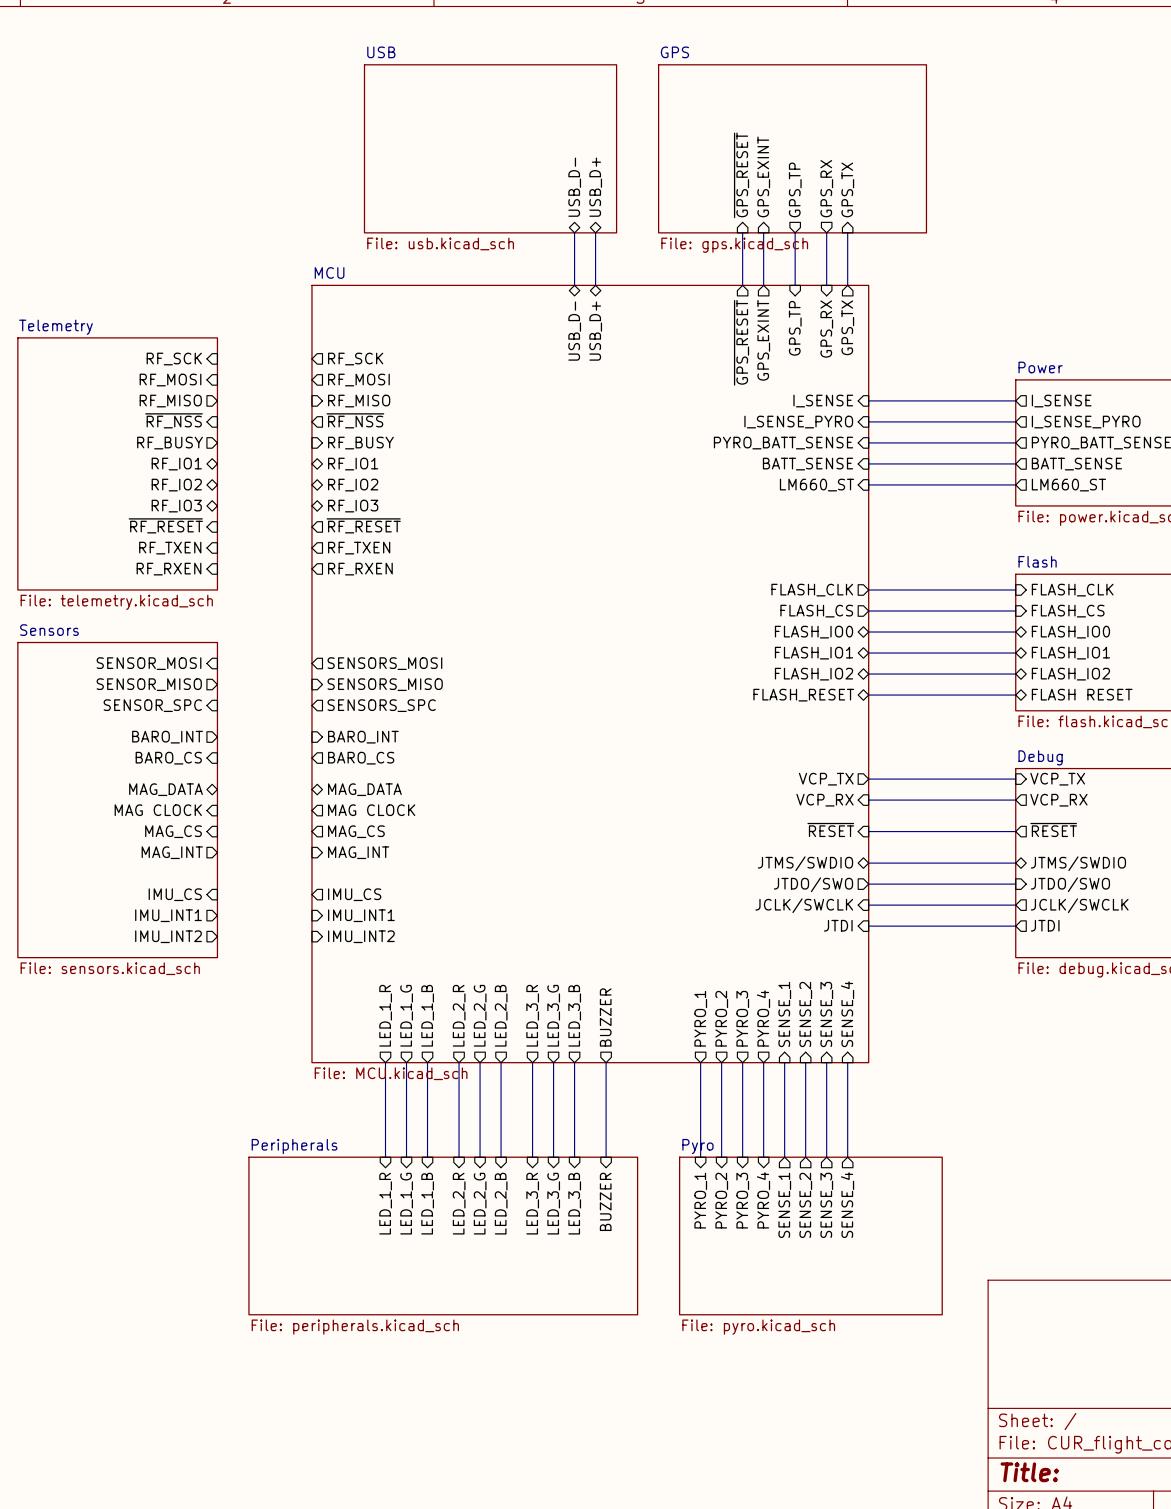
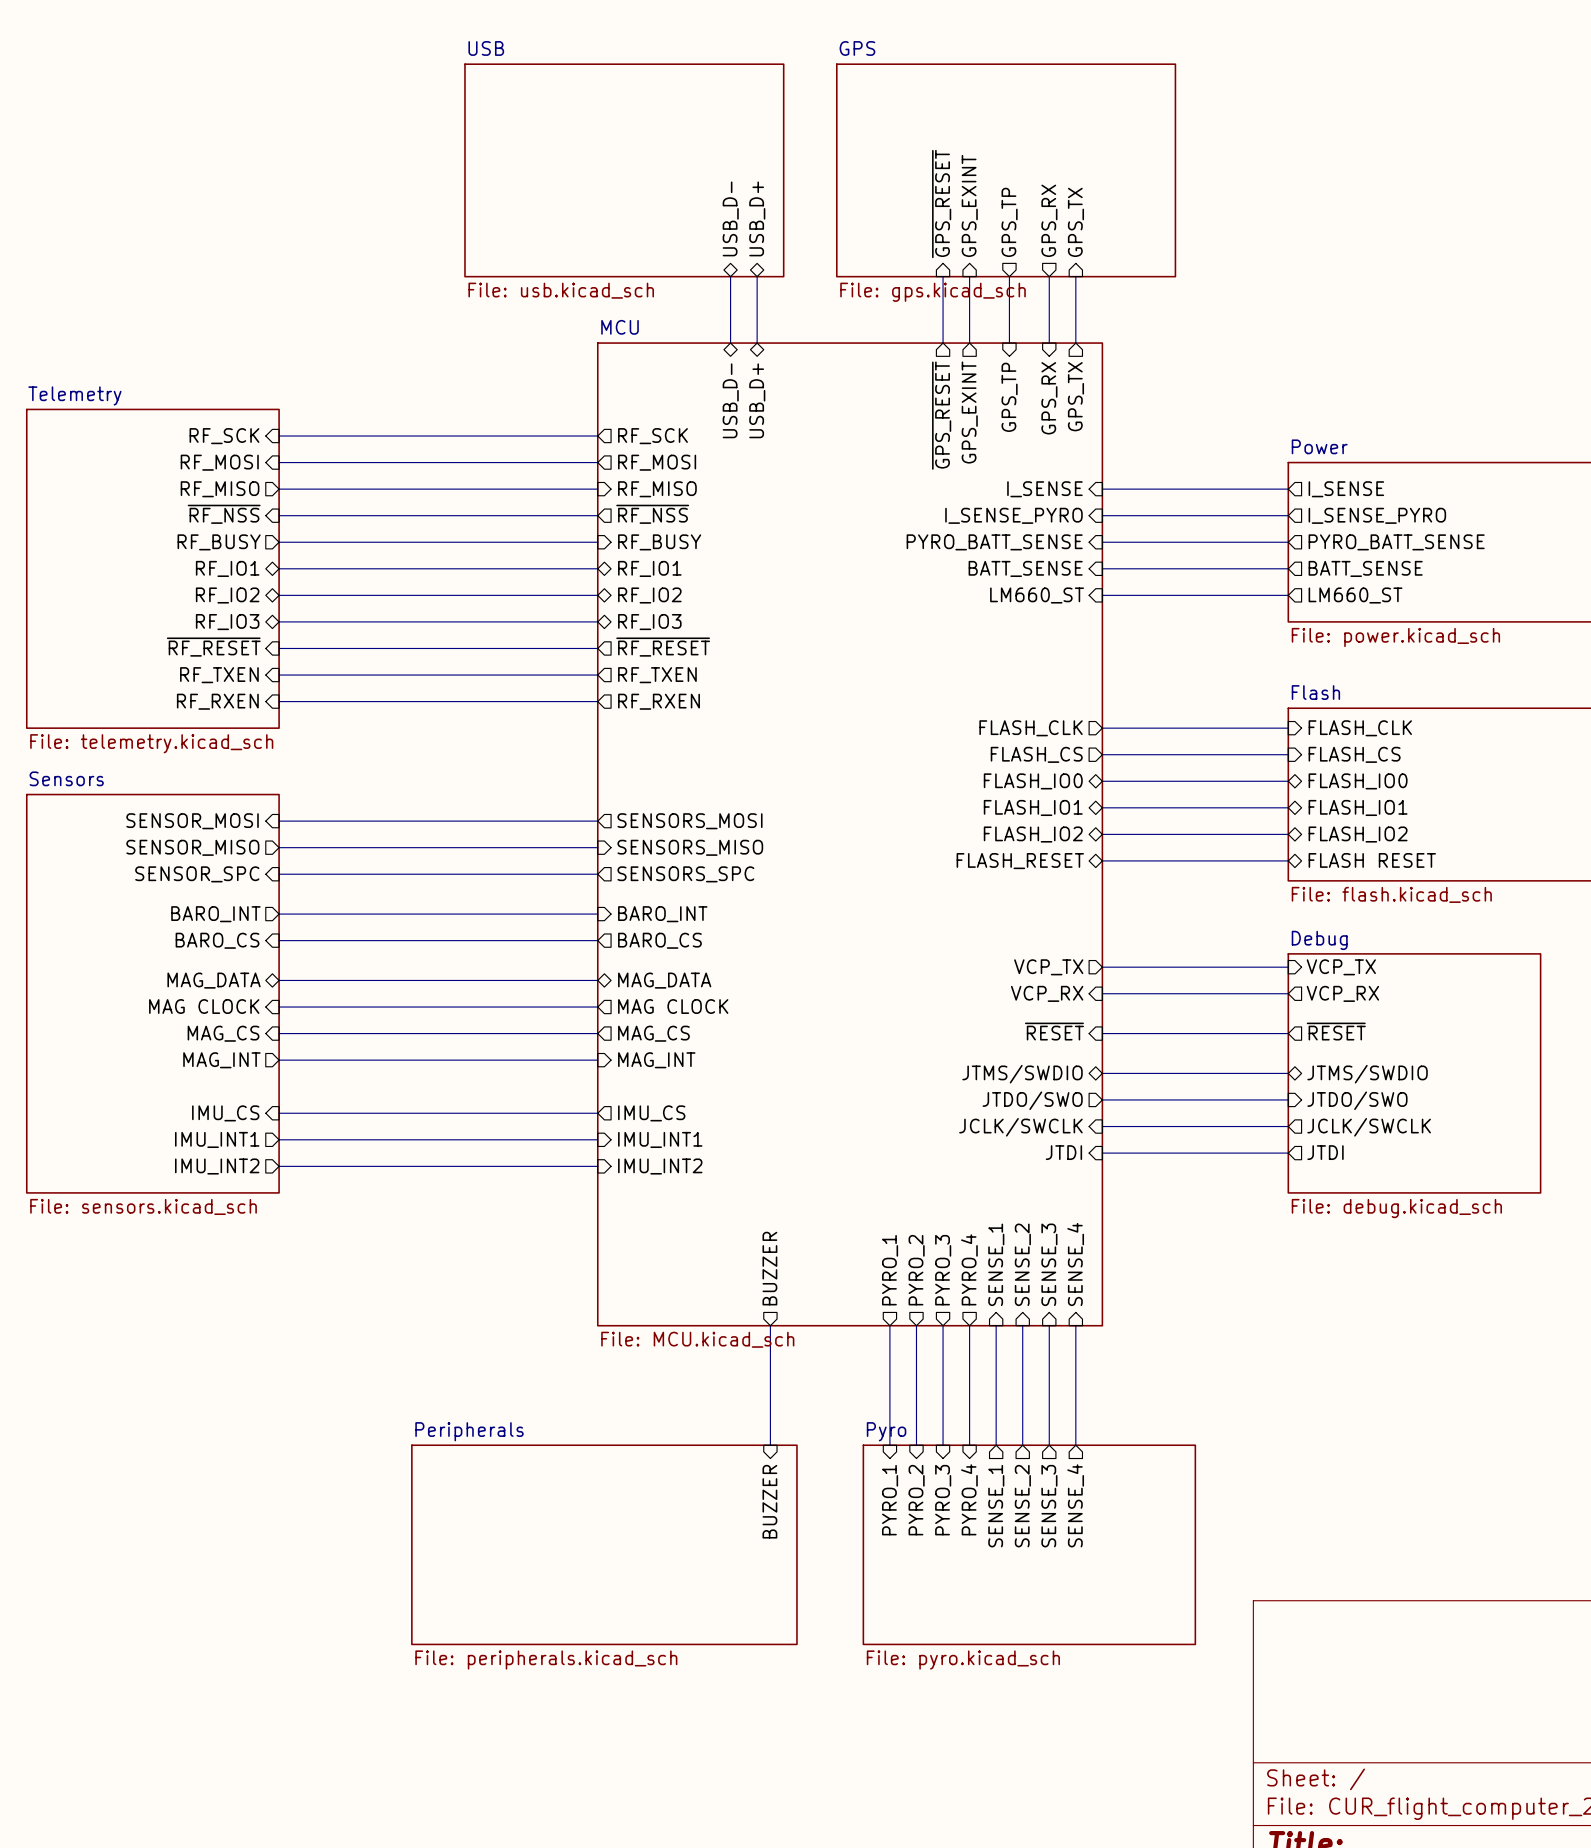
wire: none -> (279, 436) (597, 436)
sheet pin position: RF_SCK (355, 359) -> RF_SCK (653, 436)
wire: none -> (279, 462) (597, 462)
sheet pin position: RF_MOSI (358, 380) -> RF_MOSI (657, 462)
wire: none -> (279, 489) (597, 489)
sheet pin position: RF_MISO (359, 401) -> RF_MISO (657, 489)
sheet pin position: ~{RF_NSS} (355, 420) -> ~{RF_NSS} (652, 514)
wire: none -> (279, 515) (597, 515)
wire: none -> (279, 542) (597, 542)
sheet pin position: RF_BUSY (360, 443) -> RF_BUSY (659, 542)
wire: none -> (279, 568) (597, 568)
sheet pin position: RF_IO1 (353, 464) -> RF_IO1 (649, 568)
wire: none -> (279, 595) (597, 595)
sheet pin position: RF_IO2 (353, 485) -> RF_IO2 (649, 595)
wire: none -> (279, 621) (597, 621)
sheet pin position: RF_IO3 (353, 506) -> RF_IO3 (649, 622)
sheet pin position: ~{RF_RESET} (363, 525) -> ~{RF_RESET} (663, 647)
wire: none -> (279, 648) (597, 648)
wire: none -> (279, 675) (597, 675)
sheet pin position: RF_TXEN (359, 548) -> RF_TXEN (657, 675)
wire: none -> (279, 701) (597, 701)
sheet pin position: RF_RXEN (360, 569) -> RF_RXEN (659, 701)
wire: none -> (279, 821) (597, 821)
sheet pin position: SENSORS_MOSI (384, 663) -> SENSORS_MOSI (689, 821)
sheet MCU: File: MCU.kicad_sch (590, 674) -> none
sheet MCU: none -> File: MCU.kicad_sch (850, 834)
wire: none -> (279, 847) (597, 847)
sheet pin position: SENSORS_MISO (385, 684) -> SENSORS_MISO (690, 847)
wire: none -> (279, 874) (597, 874)
sheet pin position: SENSORS_SPC (381, 705) -> SENSORS_SPC (685, 874)
wire: none -> (279, 914) (597, 914)
sheet pin position: BARO_INT (363, 737) -> BARO_INT (662, 914)
wire: none -> (279, 940) (597, 940)
sheet pin position: BARO_CS (361, 758) -> BARO_CS (659, 940)
wire: none -> (279, 980) (597, 980)
sheet pin position: MAG_DATA (364, 789) -> MAG_DATA (664, 980)
wire: none -> (279, 1007) (597, 1007)
sheet pin position: MAG CLOCK (371, 810) -> MAG CLOCK (673, 1006)
wire: none -> (279, 1033) (597, 1033)
sheet pin position: MAG_CS (356, 831) -> MAG_CS (653, 1033)
wire: none -> (279, 1060) (597, 1060)
sheet pin position: MAG_INT (358, 852) -> MAG_INT (656, 1060)
wire: none -> (279, 1113) (597, 1113)
sheet pin position: IMU_CS (354, 894) -> IMU_CS (651, 1113)
wire: none -> (279, 1139) (597, 1139)
sheet pin position: IMU_INT1 (361, 915) -> IMU_INT1 (660, 1139)
wire: none -> (279, 1166) (597, 1166)
sheet pin position: IMU_INT2 (361, 936) -> IMU_INT2 (660, 1166)
sheet pin: LED_1_R (385, 1015) -> none
sheet pin: LED_1_G (406, 1015) -> none
sheet pin: LED_1_B (427, 1015) -> none
sheet pin: LED_2_R (459, 1015) -> none
sheet pin: LED_2_G (480, 1015) -> none
sheet pin: LED_2_B (501, 1015) -> none
sheet pin: LED_3_R (532, 1015) -> none
sheet pin: LED_3_G (553, 1015) -> none
sheet pin: LED_3_B (574, 1015) -> none
wire: (385, 1062) (385, 1157) -> none
wire: (406, 1062) (406, 1157) -> none
wire: (427, 1062) (427, 1157) -> none
wire: (459, 1062) (459, 1157) -> none
wire: (480, 1062) (480, 1157) -> none
wire: (501, 1062) (501, 1157) -> none
wire: (532, 1062) (532, 1157) -> none
wire: (553, 1062) (553, 1157) -> none
wire: (574, 1062) (574, 1157) -> none
sheet pin: LED_1_R (385, 1203) -> none
sheet pin: LED_1_G (406, 1203) -> none
sheet pin: LED_1_B (427, 1203) -> none
sheet pin: LED_2_R (459, 1203) -> none
sheet pin: LED_2_G (480, 1203) -> none
sheet pin: LED_2_B (501, 1203) -> none
sheet pin: LED_3_R (532, 1203) -> none
sheet pin: LED_3_G (553, 1203) -> none
sheet pin: LED_3_B (574, 1203) -> none
sheet Peripherals: File: peripherals.kicad_sch (443, 1235) -> none
sheet Peripherals: none -> File: peripherals.kicad_sch (604, 1544)

